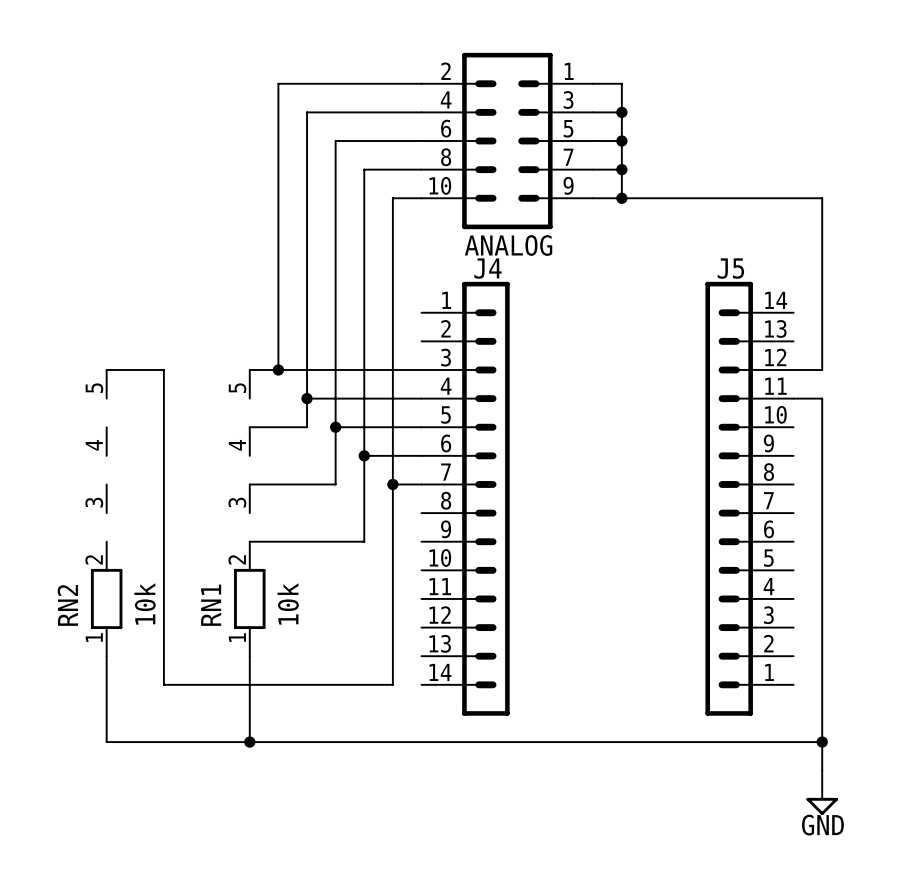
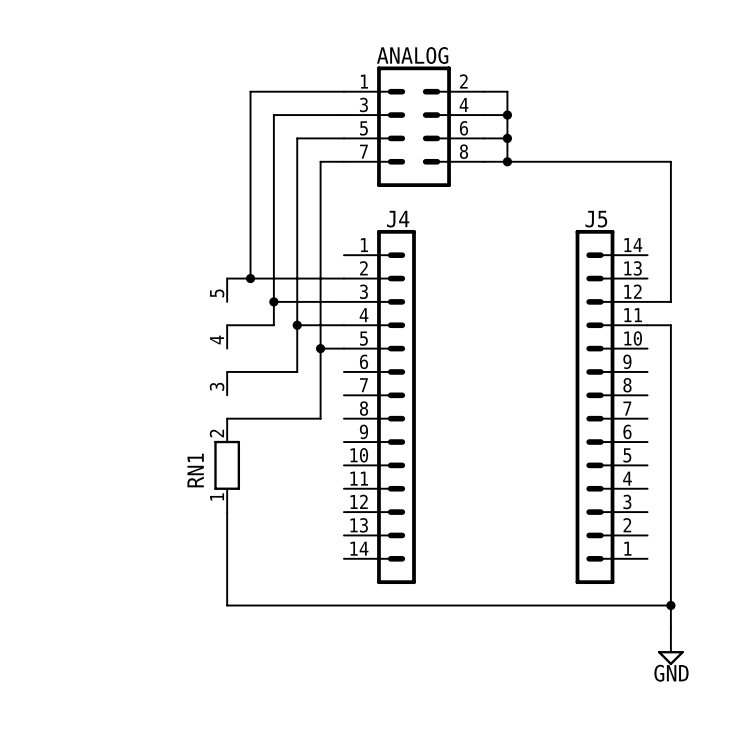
wire: (421, 83) (278, 83) (278, 369) -> none
wire: (593, 83) (621, 83) (621, 112) -> none
junction: (621, 112) -> none
ANALOG: (507, 141) -> none
ANALOG: none -> (414, 126)
wire: none -> (227, 278) (343, 278)
wire: (307, 341) (307, 427) (249, 427) -> none
junction: none -> (250, 278)
wire: (106, 369) (163, 369) (163, 684) (392, 684) (392, 513) -> (227, 418) (320, 418)
wire: (249, 369) (335, 369) -> (227, 371) (297, 371)
junction: (278, 369) -> none
junction: none -> (273, 301)
junction: (307, 398) -> none
wire: (364, 398) (335, 398) (335, 484) (249, 484) -> none
junction: none -> (297, 325)
wire: (335, 427) (392, 427) -> none
junction: (335, 427) -> none
junction: none -> (320, 348)
junction: (364, 455) -> none
wire: (421, 455) (364, 455) (364, 541) (249, 541) -> none
wire: (392, 484) (421, 484) -> (227, 325) (250, 325)
junction: (392, 484) -> none
RN2: 10k (106, 513) -> none
RN1 position: (249, 513) -> (227, 395)
RN1 value: 10k (288, 603) -> none
wire: (106, 656) (106, 742) (278, 742) -> (227, 512) (227, 605)
wire: (249, 656) (249, 742) -> none
junction: (249, 742) -> none

